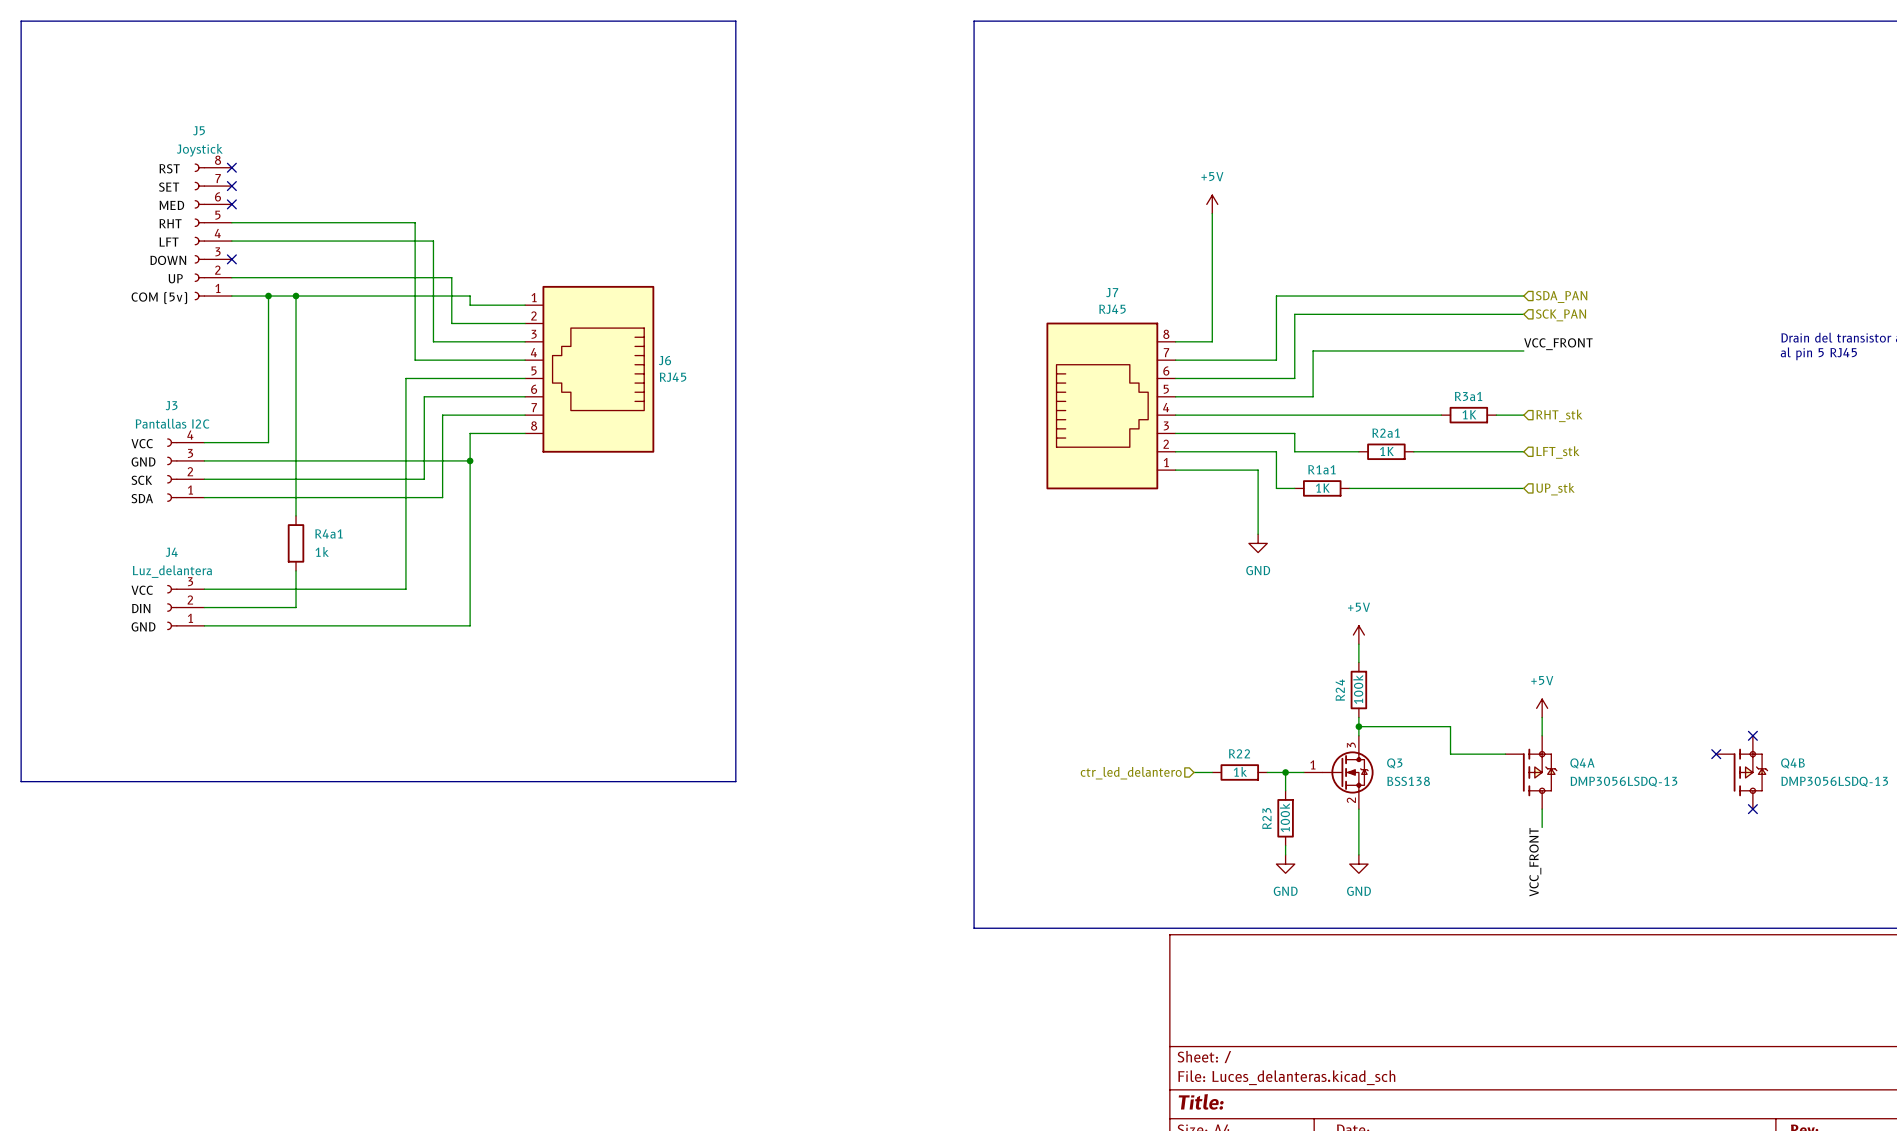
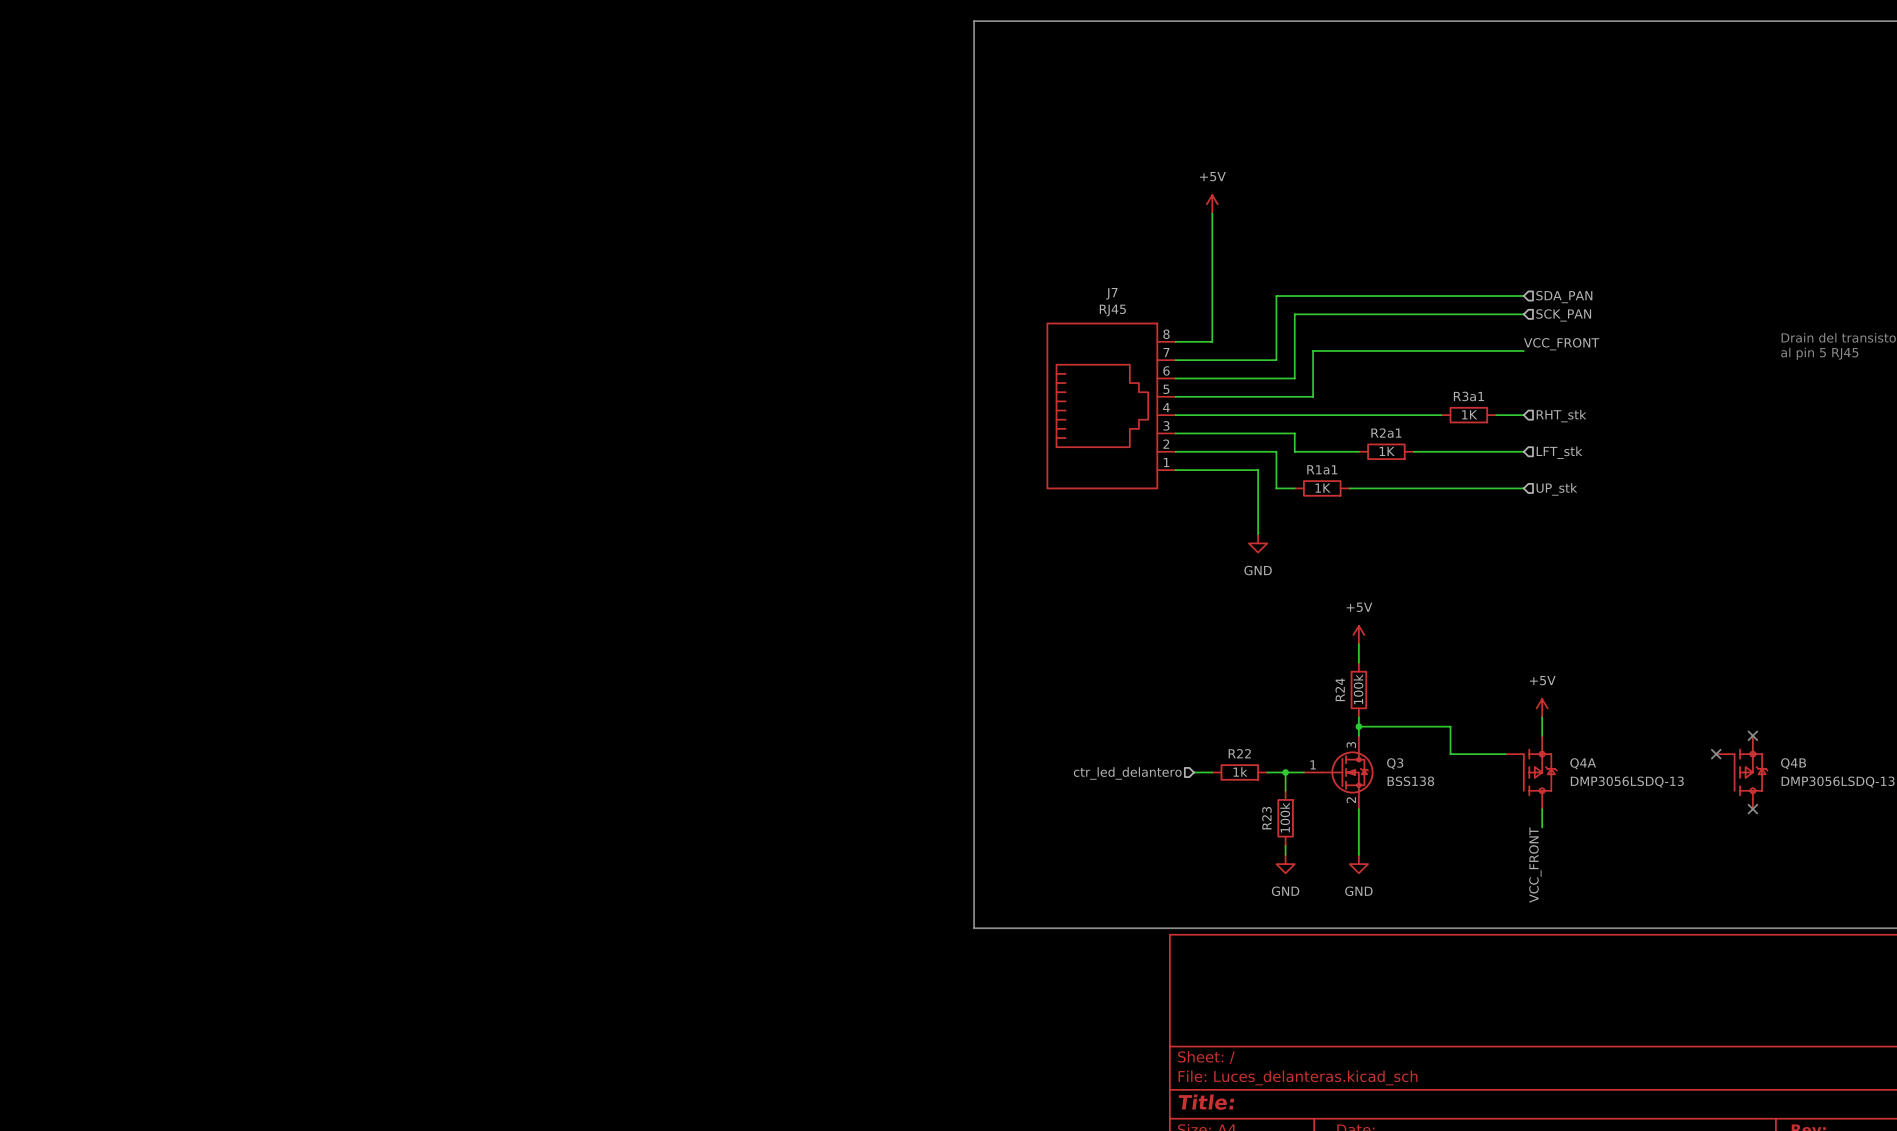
line: (21, 21) (735, 21) (735, 781) (21, 781) (21, 21) -> none
no-connect mark: (231, 167) -> none
label: RST (169, 168) -> none
no-connect mark: (231, 186) -> none
label: SET (169, 187) -> none
no-connect mark: (231, 204) -> none
label: MED (171, 205) -> none
wire: (231, 222) (415, 222) (415, 360) (525, 360) -> none
label: RHT (170, 223) -> none
J5: Joystick (213, 231) -> none
wire: (231, 241) (433, 241) (433, 341) (525, 341) -> none
label: LFT (169, 242) -> none
no-connect mark: (231, 259) -> none
label: DOWN (168, 260) -> none
wire: (231, 277) (451, 277) (451, 323) (525, 323) -> none
label: UP (175, 278) -> none
wire: (231, 296) (470, 296) (470, 305) (525, 305) -> none
wire: (268, 296) (268, 442) (204, 442) -> none
junction: (268, 296) -> none
wire: (296, 296) (296, 515) -> none
junction: (296, 296) -> none
label: COM (5v) (159, 298) -> none
J6: RJ45 (589, 369) -> none
wire: (525, 378) (405, 378) (405, 589) (204, 589) -> none
wire: (525, 396) (424, 396) (424, 479) (204, 479) -> none
wire: (525, 415) (442, 415) (442, 497) (204, 497) -> none
wire: (525, 433) (470, 433) (470, 625) (204, 625) -> none
label: VCC (142, 443) -> none
wire: (204, 460) (470, 460) -> none
junction: (470, 460) -> none
label: GND (143, 461) -> none
J3: Pantallas I2C (185, 470) -> none
label: SCK (141, 480) -> none
label: SDA (142, 498) -> none
R4a1: 1k (296, 543) -> none
wire: (296, 570) (296, 607) (204, 607) -> none
label: VCC (142, 590) -> none
J4: Luz_delantera (185, 607) -> none
label: DIN (141, 608) -> none
label: GND (143, 626) -> none

